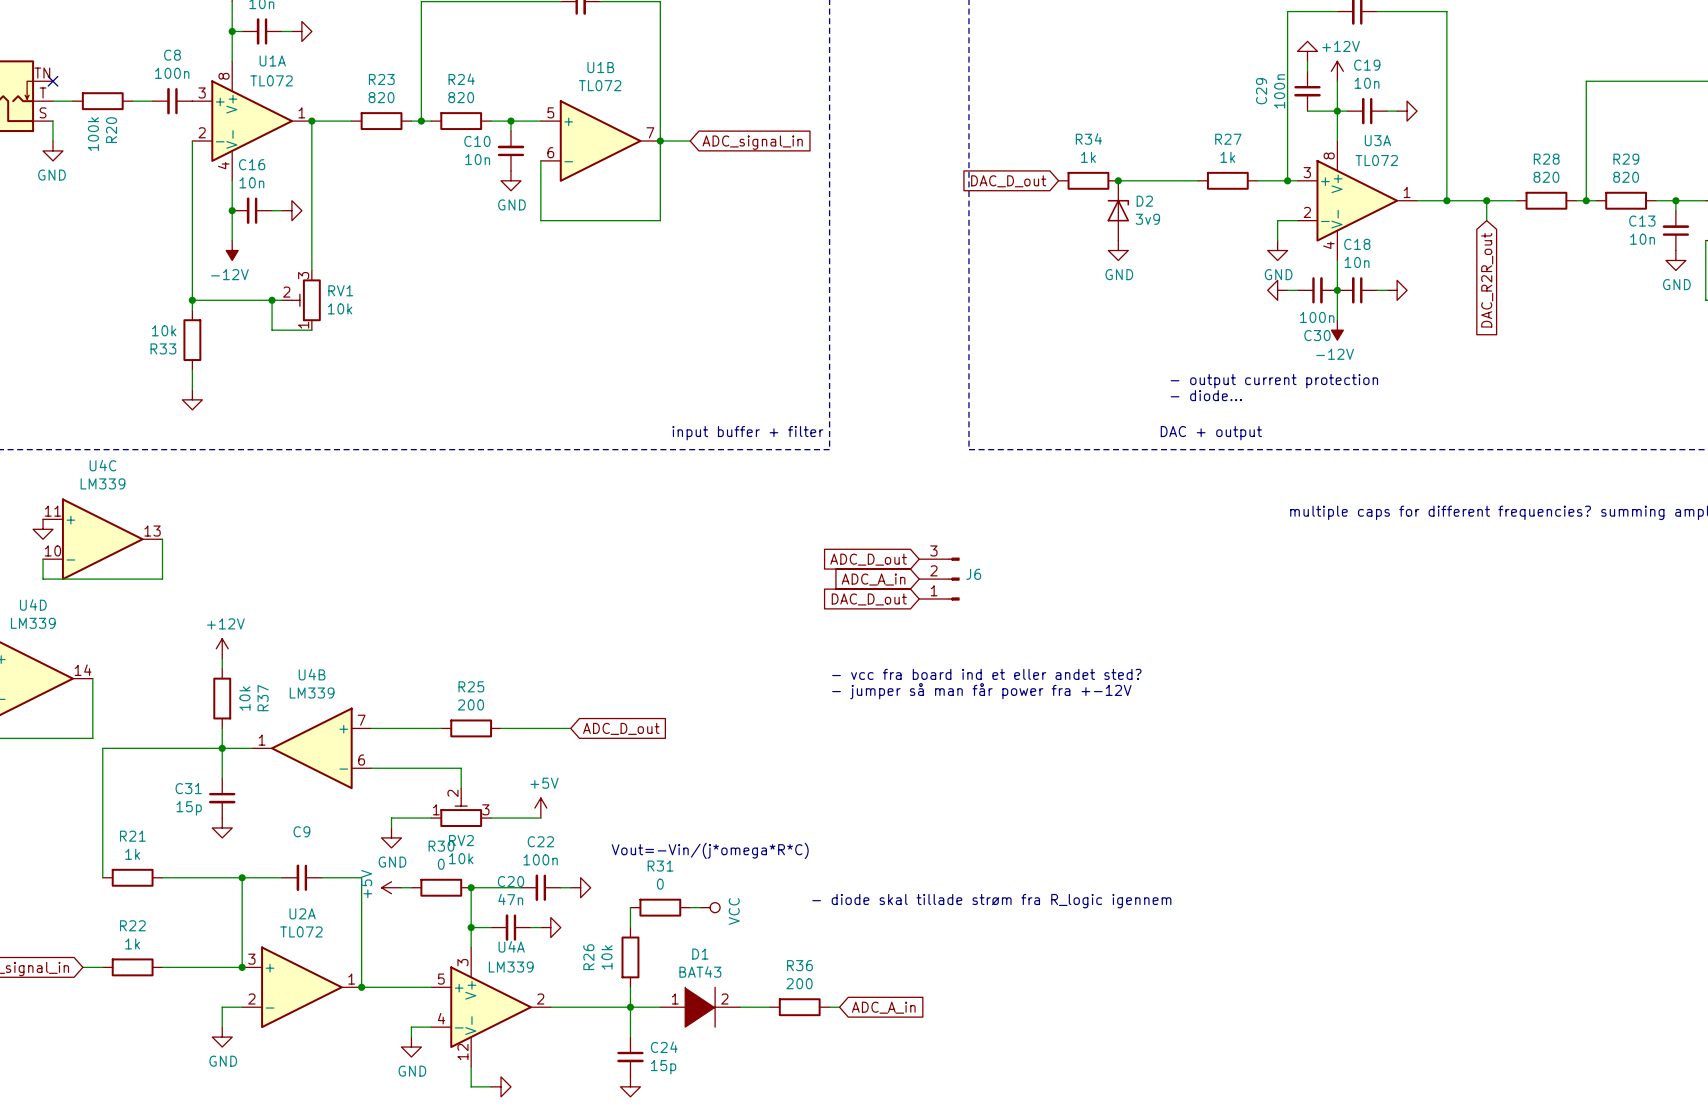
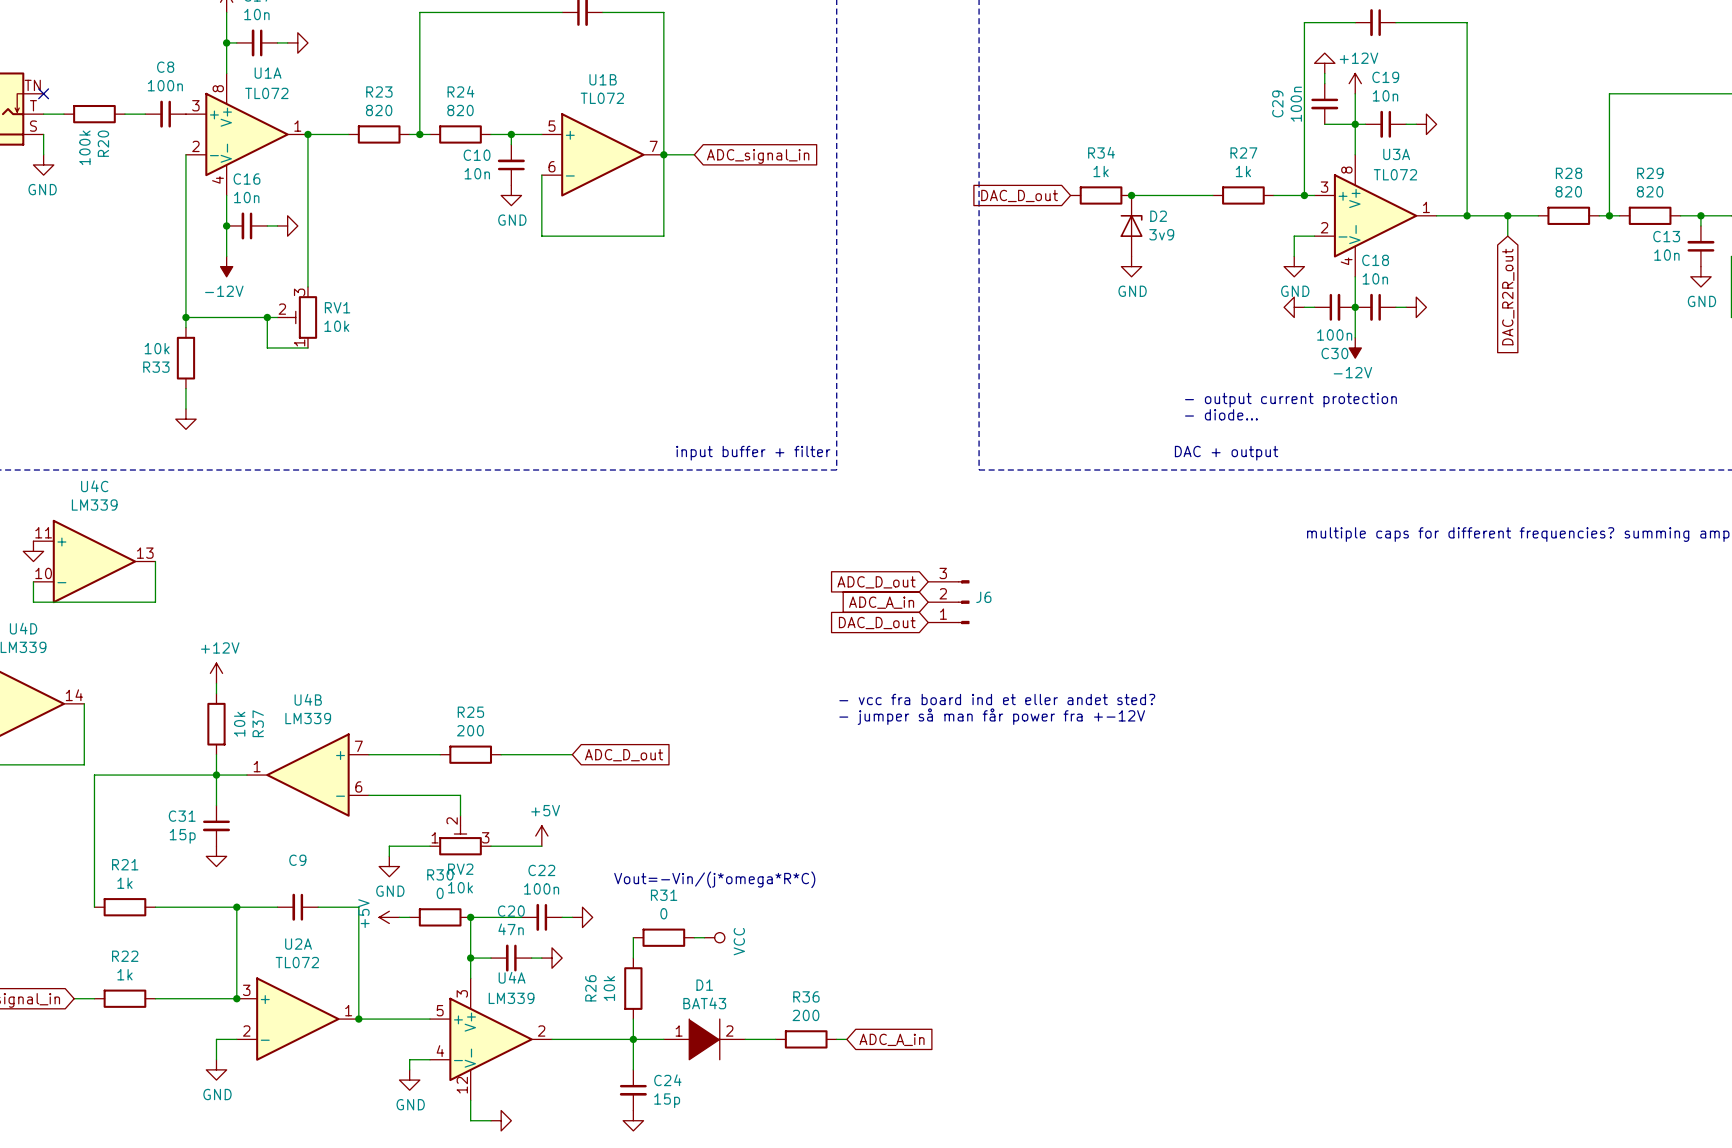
text: - diode skal tillade strøm fra R_logic igennem (991, 901) -> none

